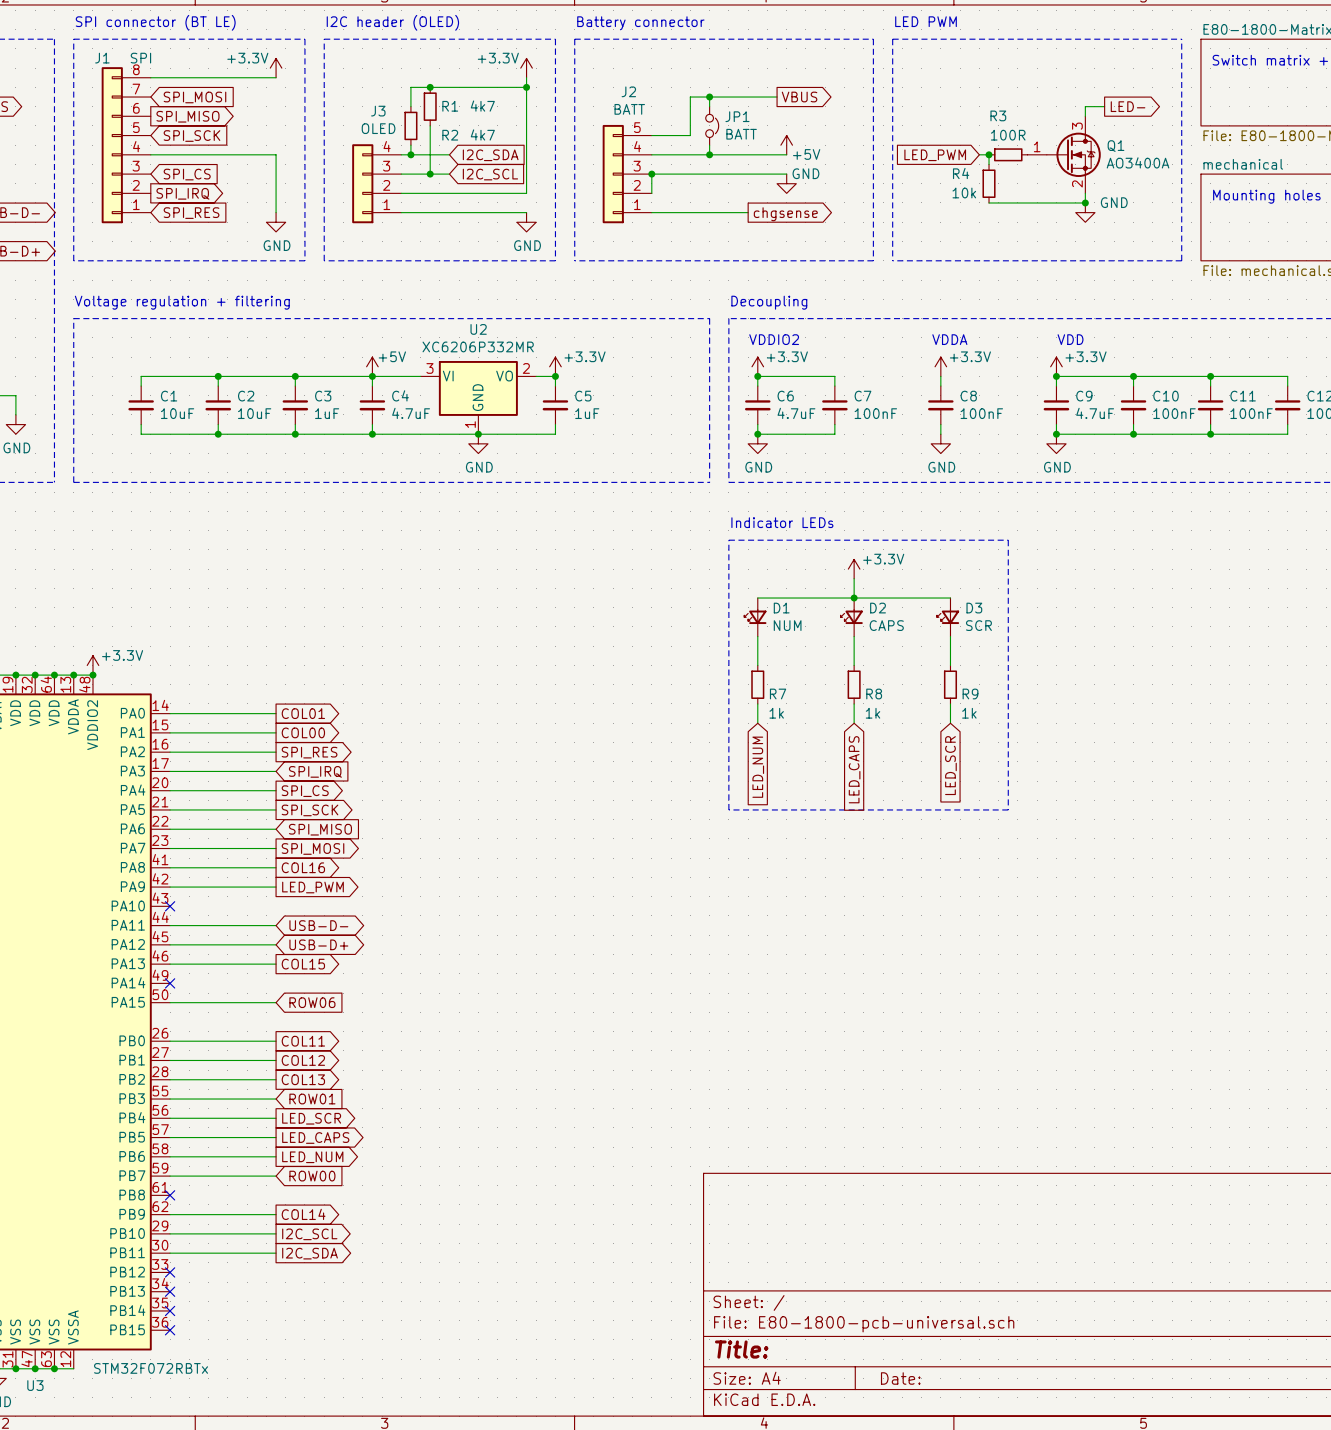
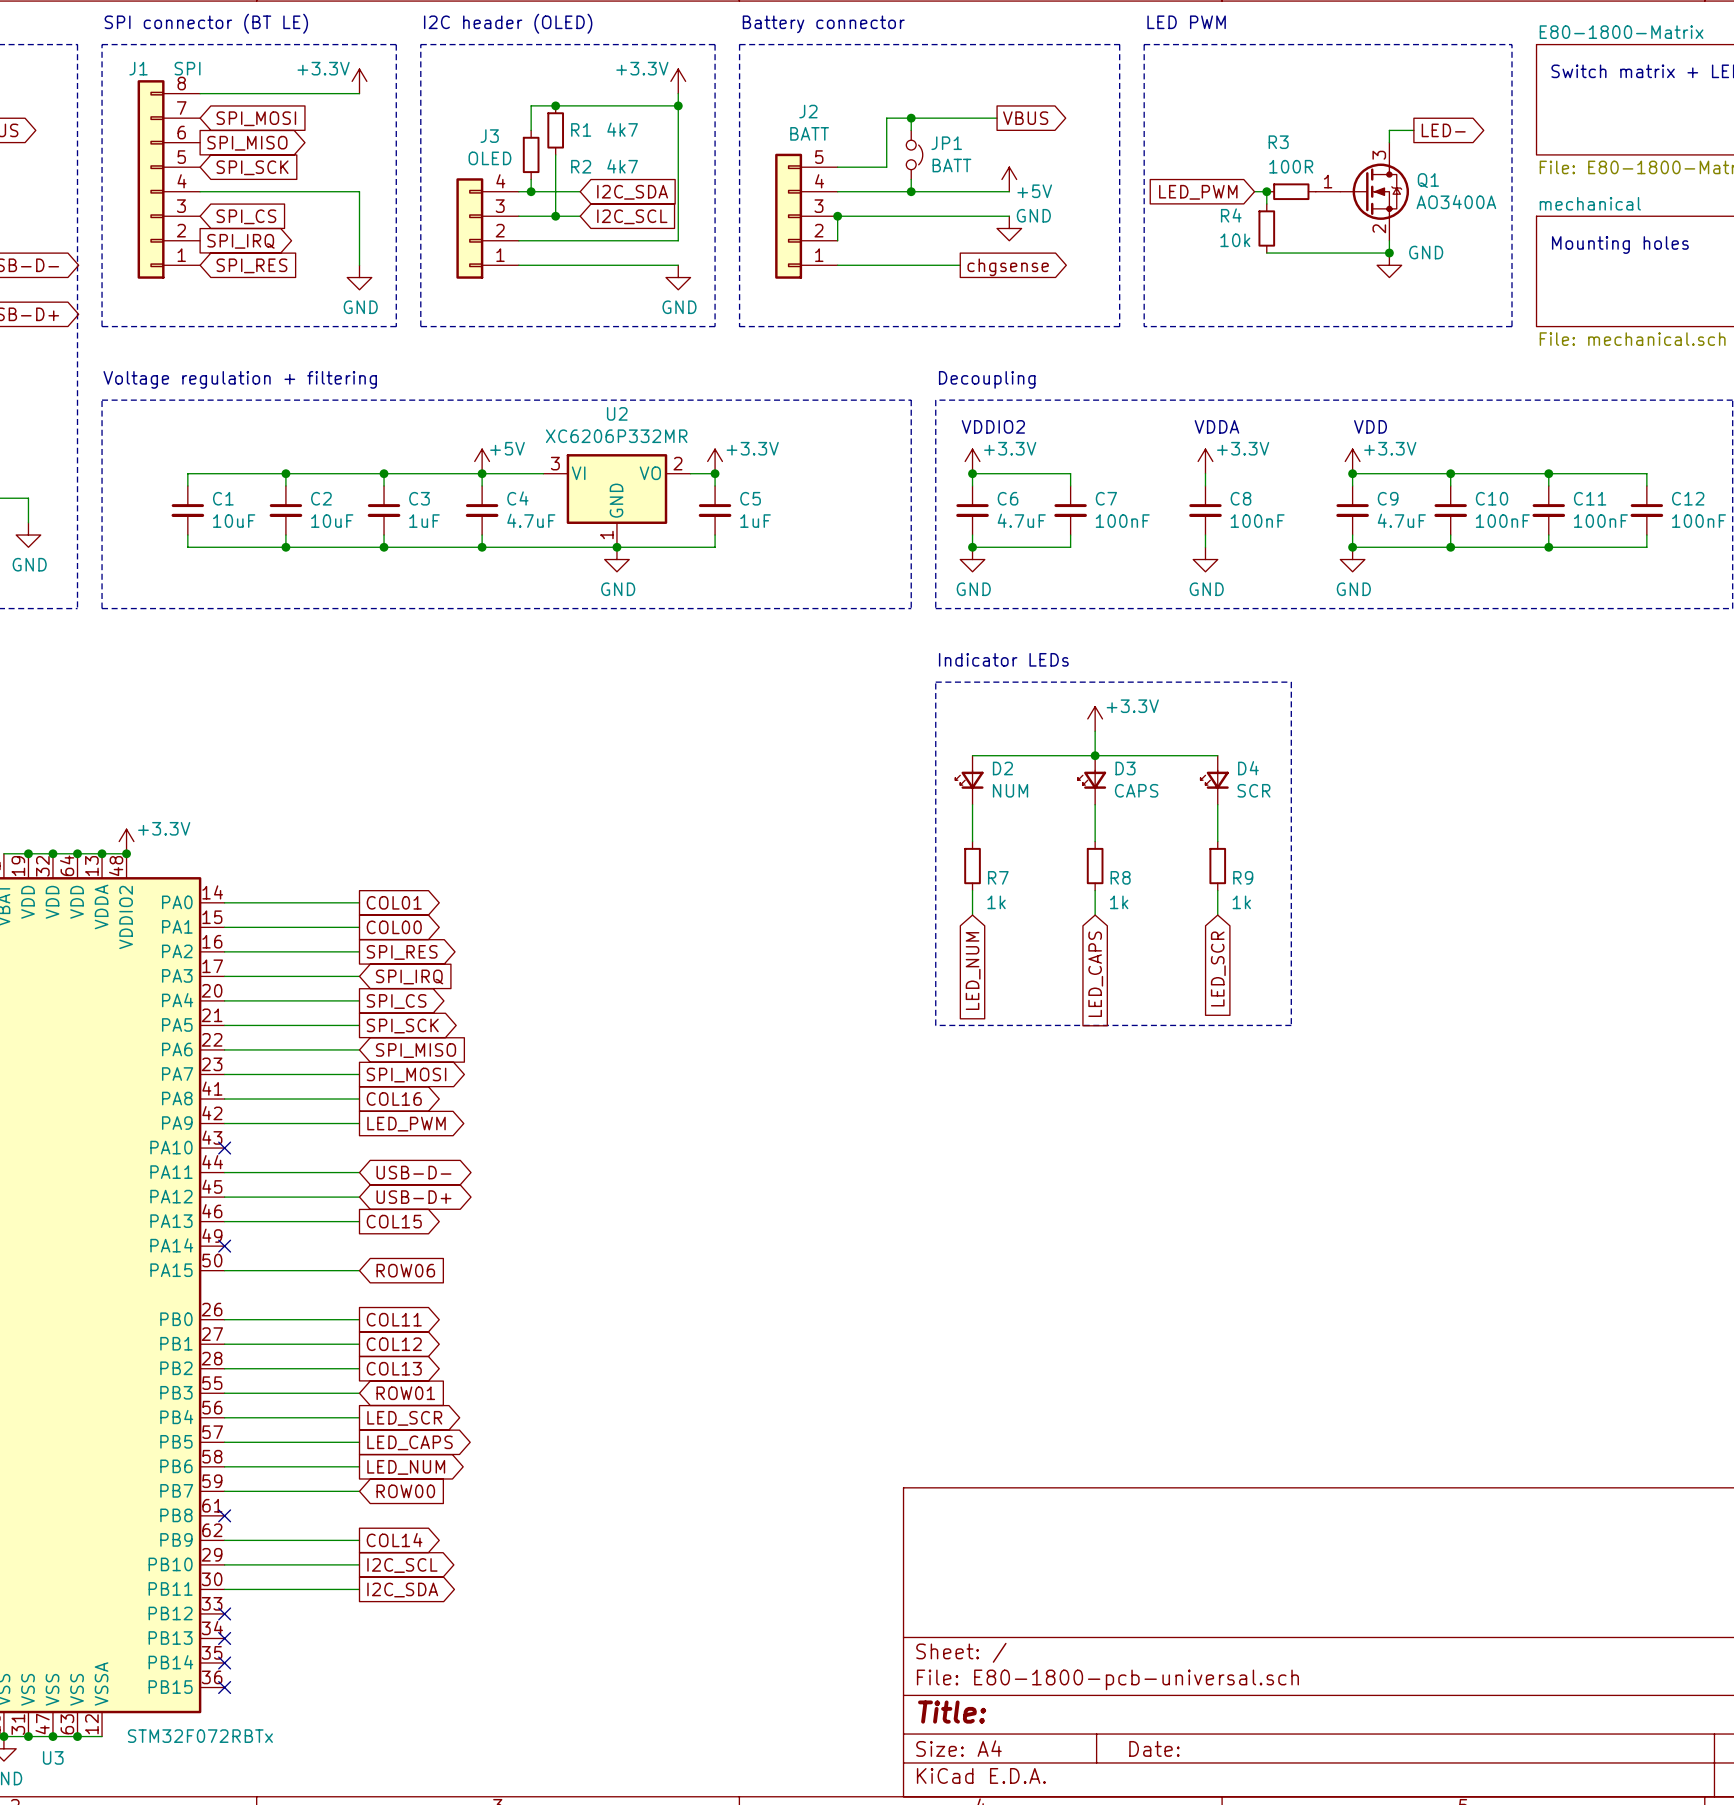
D1 name: D1 (781, 608) -> D2 (1002, 768)
D2 name: D2 (878, 608) -> D3 (1125, 768)
D3 name: D3 (974, 608) -> D4 (1248, 768)

